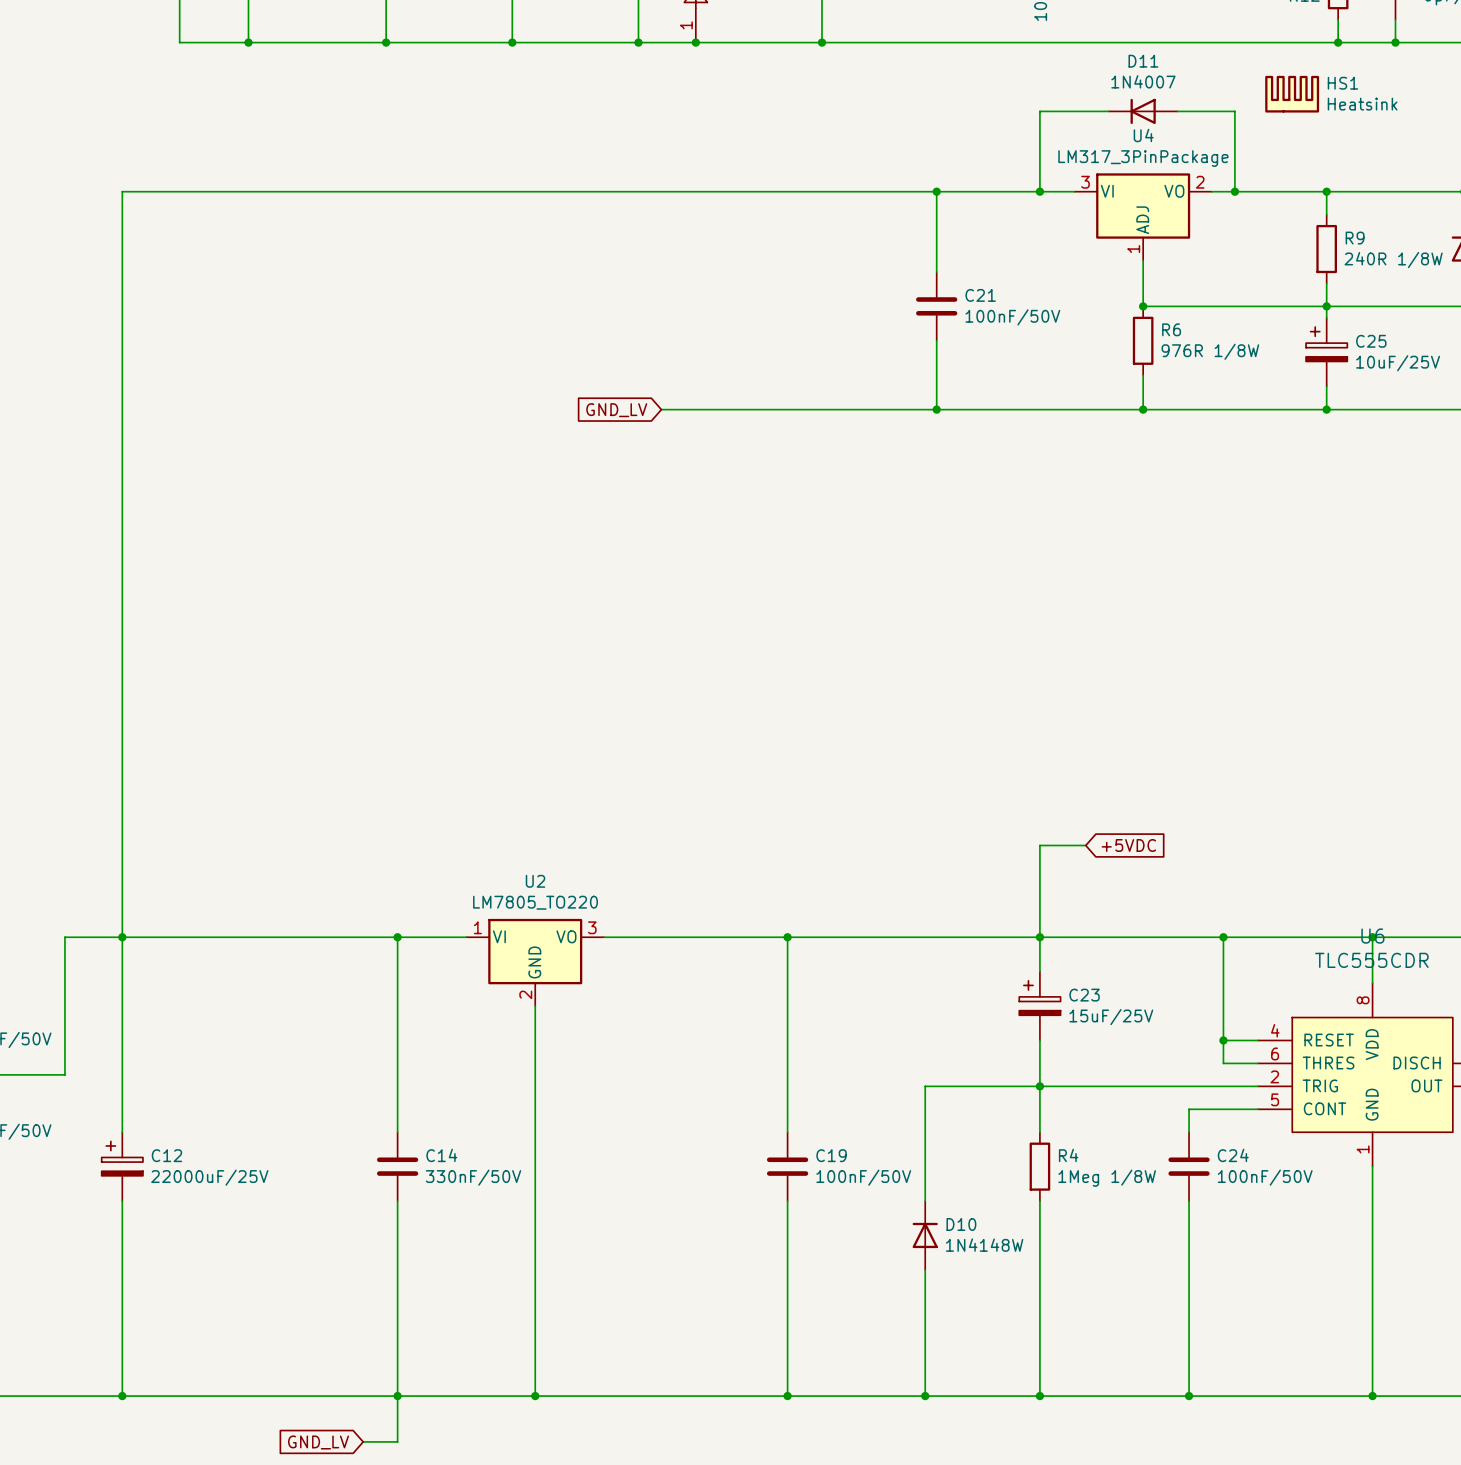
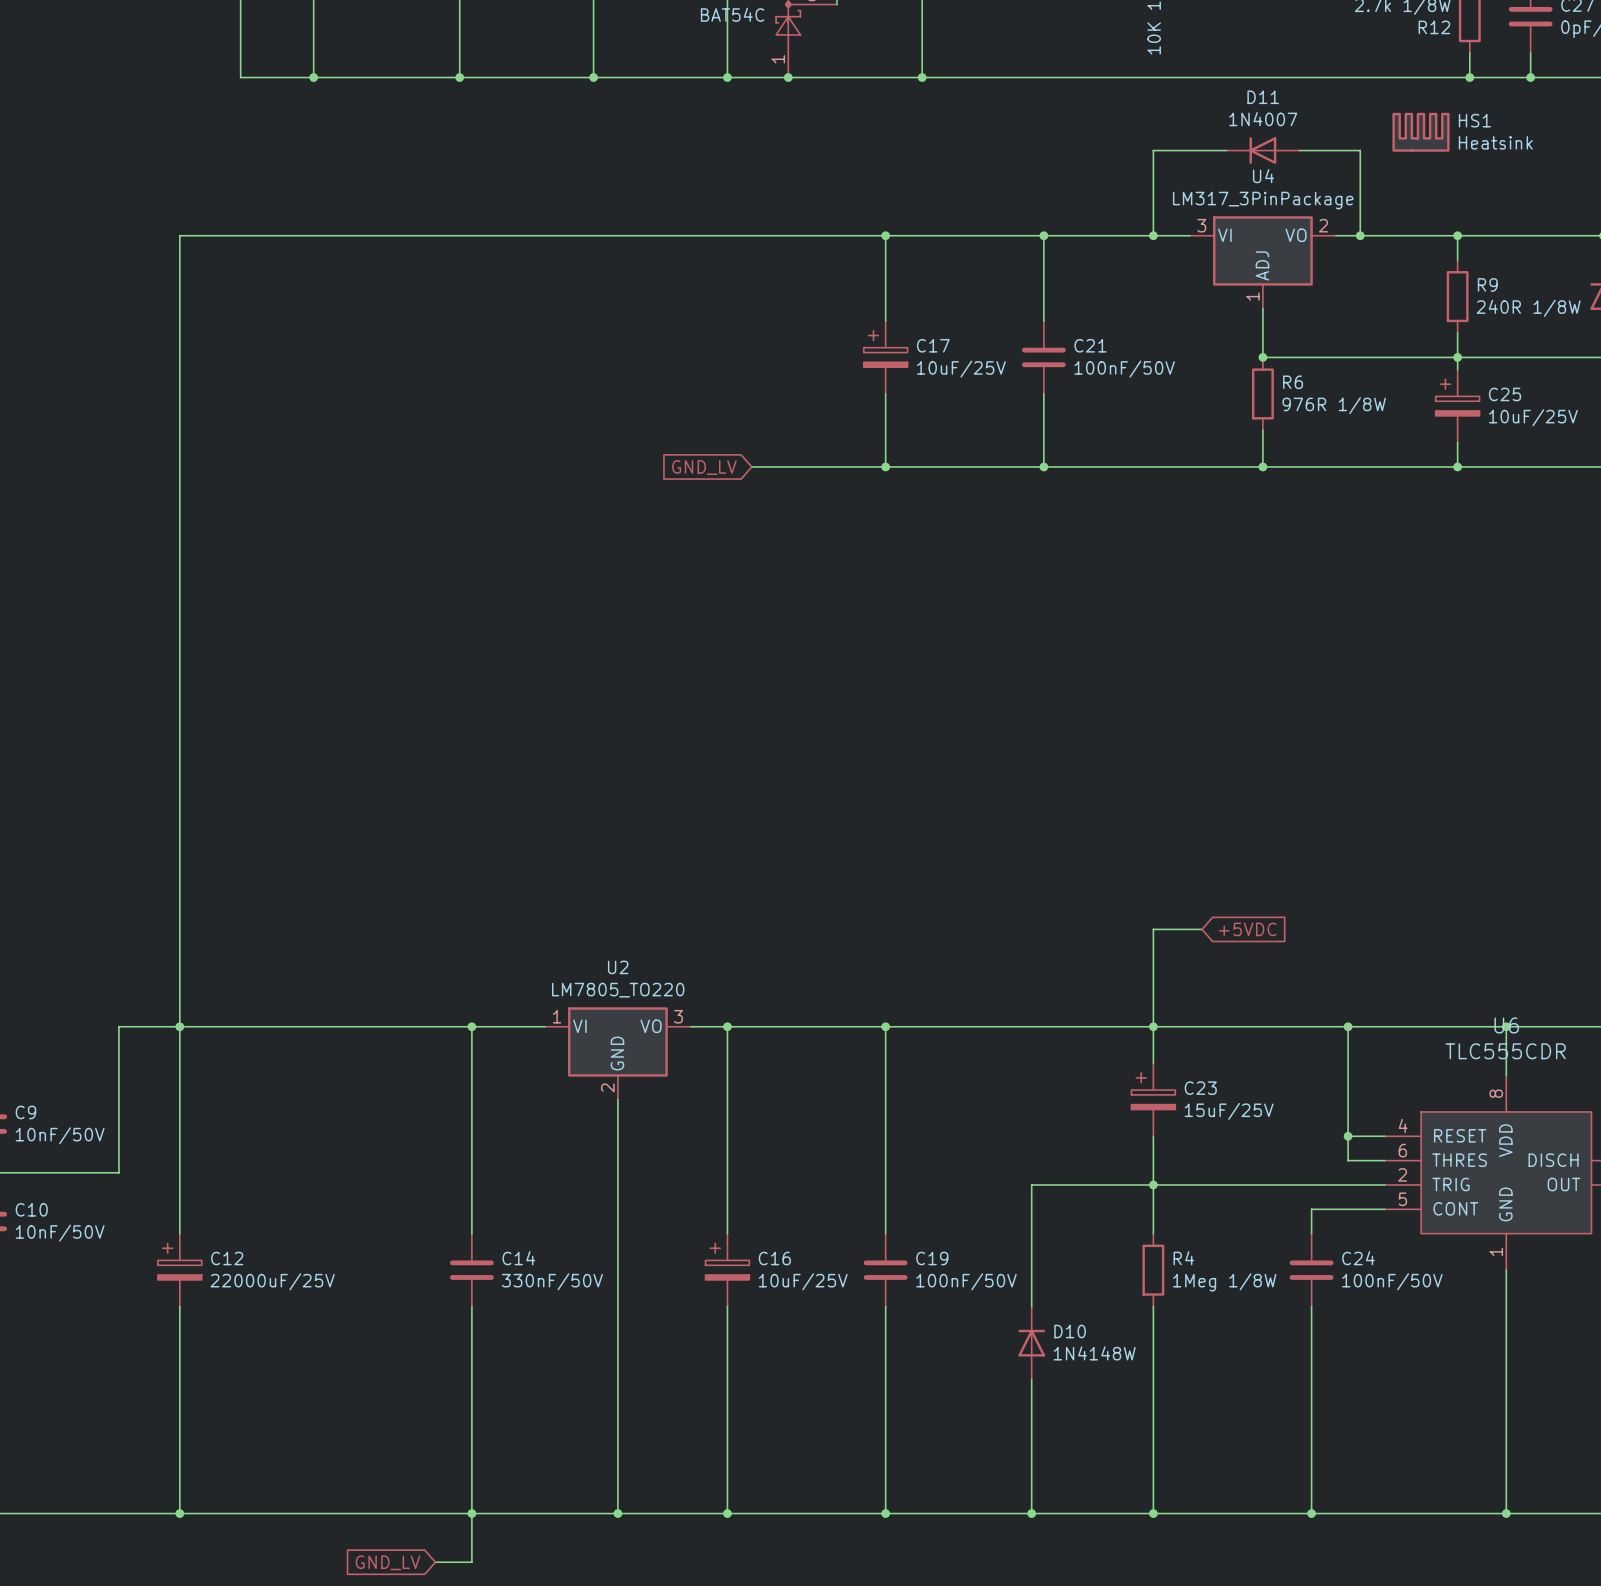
wire: none -> (885, 235) (885, 320)
junction: none -> (885, 235)
C17: none -> 10uF/25V (885, 357)
wire: none -> (885, 393) (885, 466)
junction: none -> (885, 466)
wire: none -> (727, 1026) (727, 1233)
junction: none -> (727, 1026)
C16: none -> 10uF/25V (727, 1270)
wire: none -> (727, 1306) (727, 1513)
junction: none -> (727, 1513)

